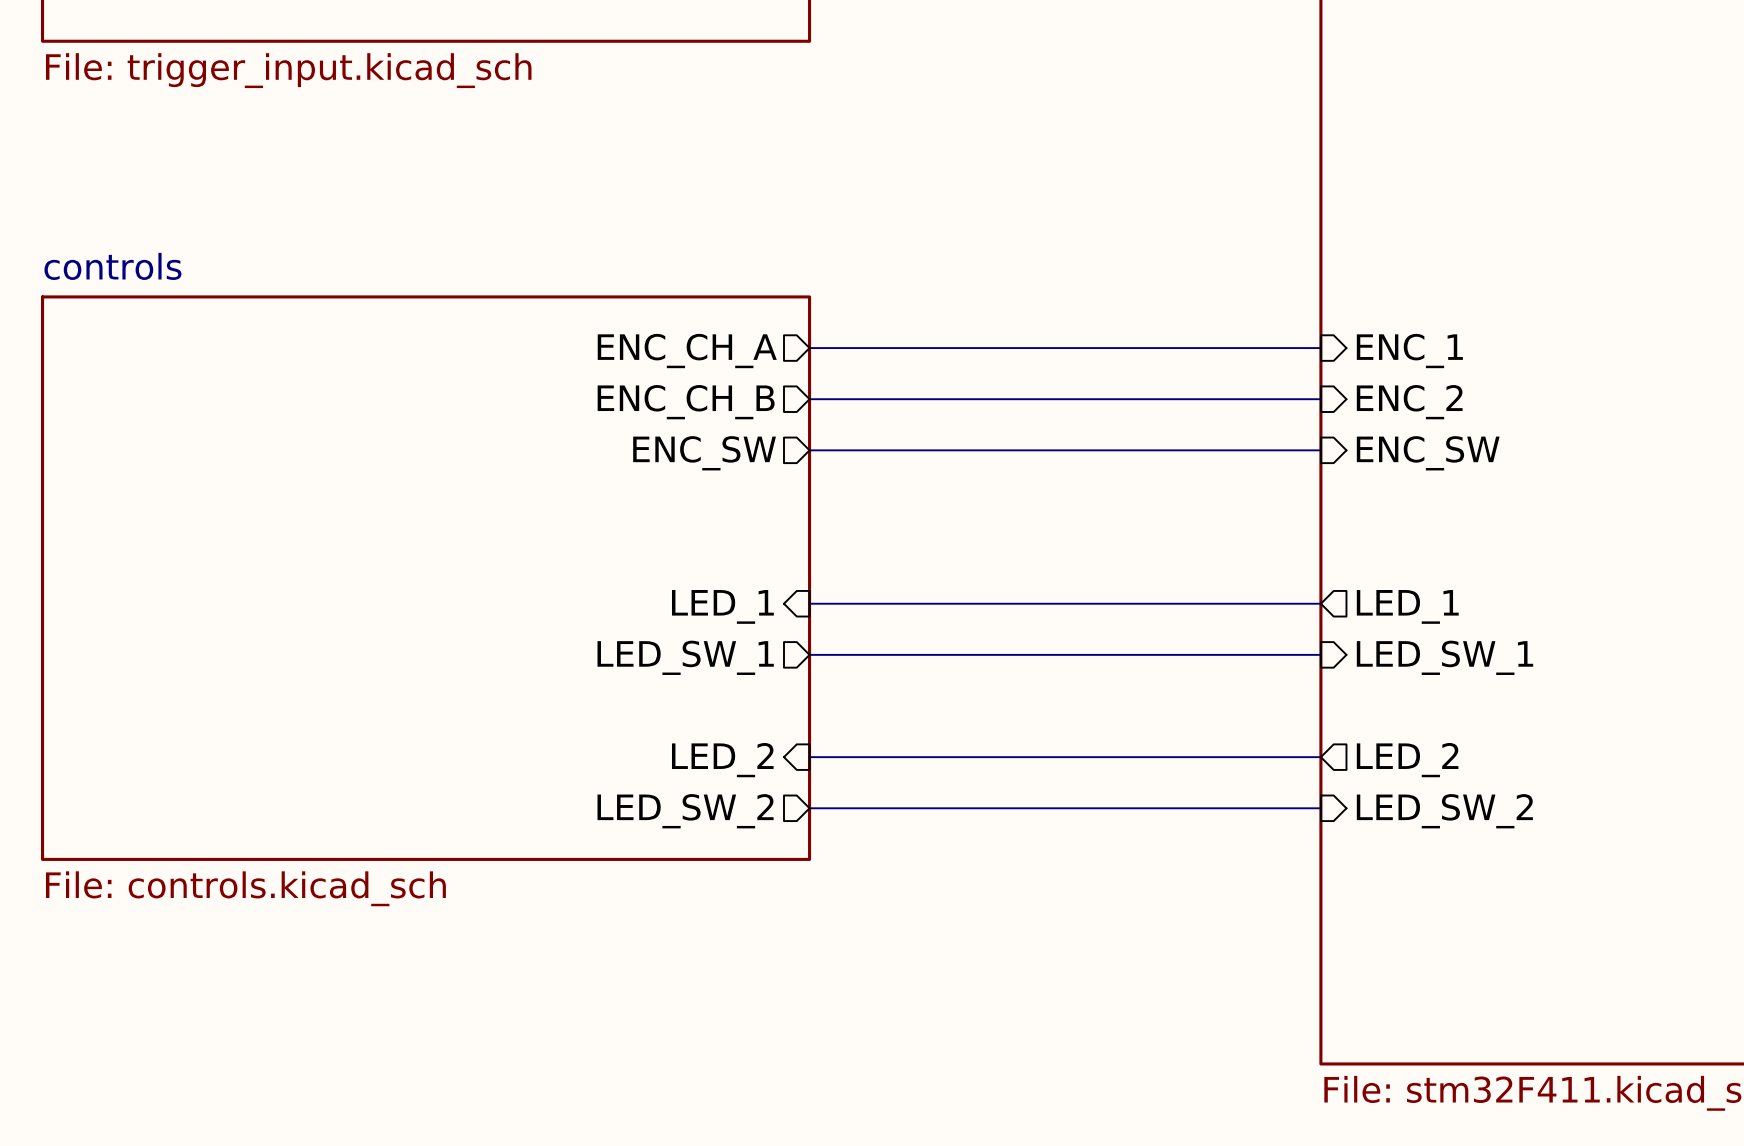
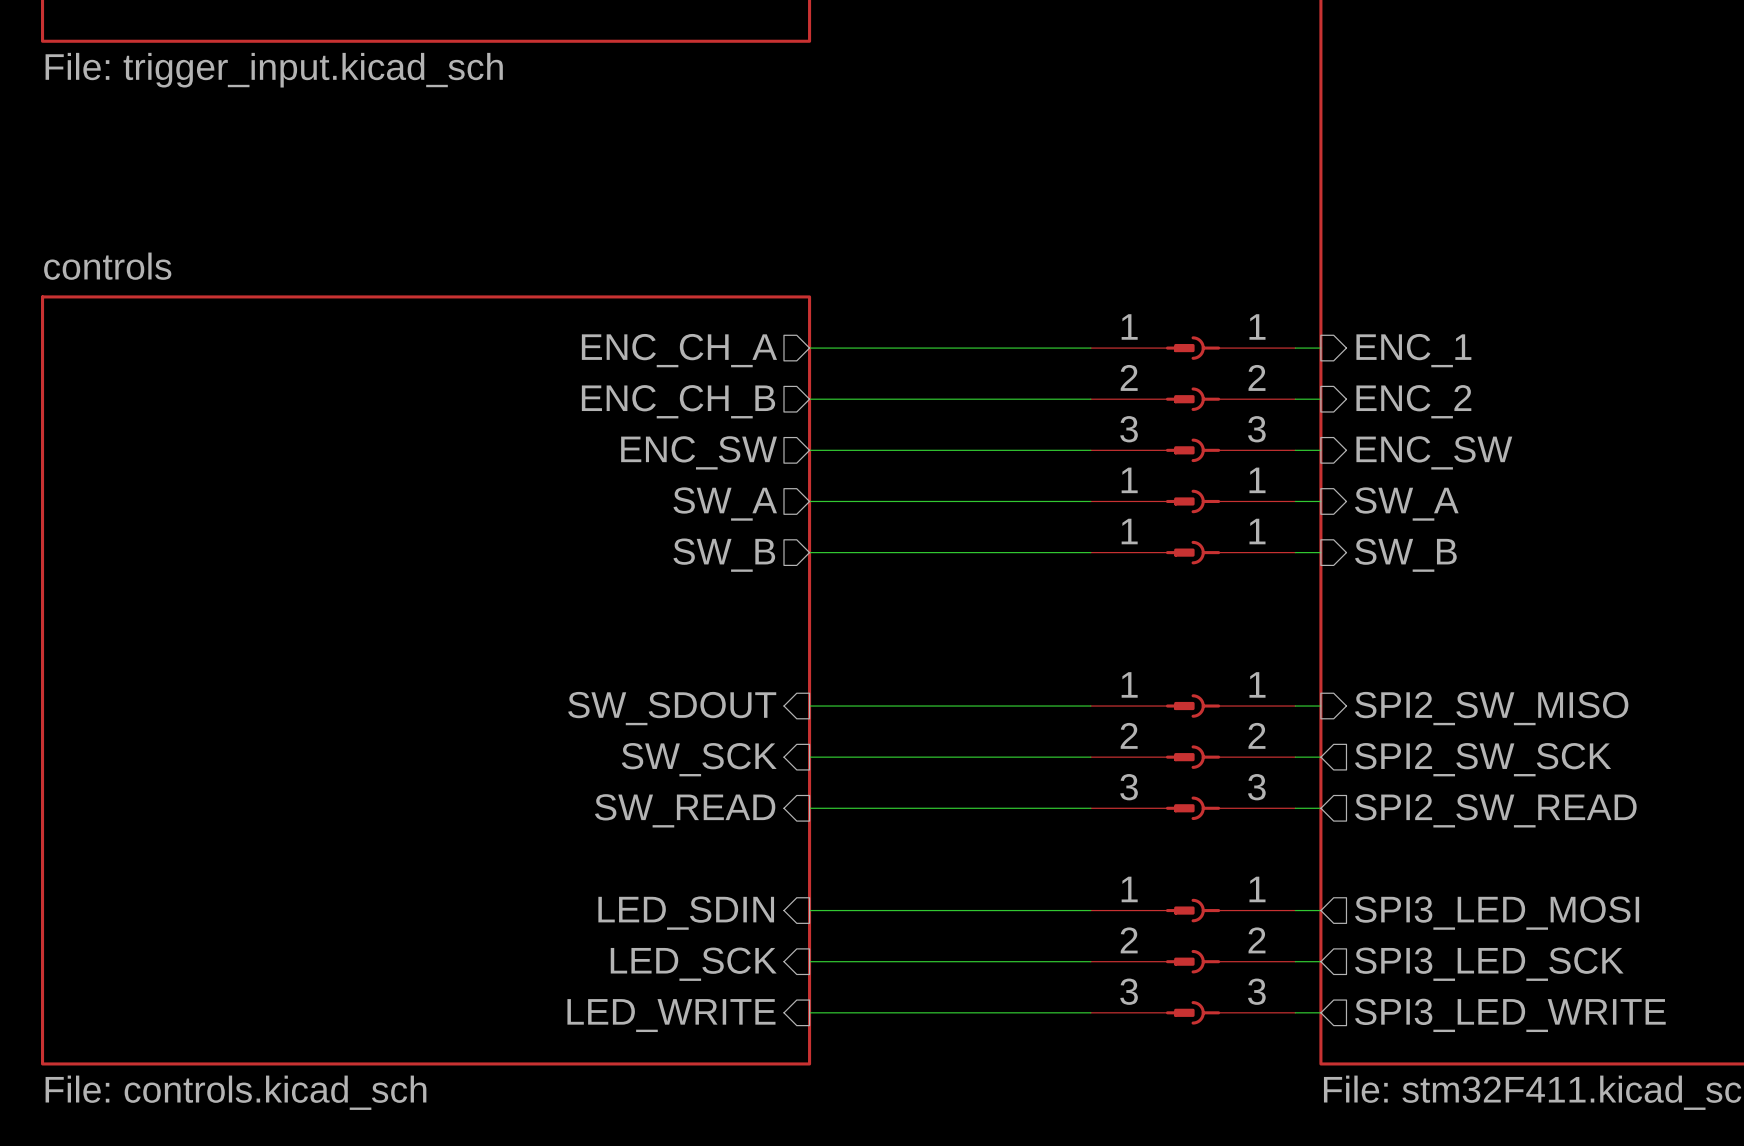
part: none -> (1142, 348)
part: none -> (1243, 348)
part: none -> (1142, 399)
part: none -> (1243, 399)
part: none -> (1142, 450)
part: none -> (1243, 450)
wire: none -> (809, 501) (1090, 501)
part: none -> (1142, 501)
part: none -> (1243, 501)
wire: none -> (1295, 501) (1320, 501)
sheet pin: none -> SW_A (725, 504)
sheet pin: none -> SW_A (1406, 504)
wire: none -> (809, 552) (1090, 552)
part: none -> (1142, 552)
part: none -> (1243, 552)
wire: none -> (1295, 552) (1320, 552)
sheet pin: none -> SW_B (724, 555)
sheet pin: none -> SW_B (1405, 555)
sheet controls: File: controls.kicad_sch (426, 578) -> none
wire: (809, 603) (1320, 603) -> none
sheet pin: LED_1 (722, 606) -> none
sheet pin: LED_1 (1407, 606) -> none
wire: (809, 654) (1320, 654) -> none
sheet pin: LED_SW_1 (685, 657) -> none
sheet pin: LED_SW_1 (1444, 657) -> none
sheet controls: none -> File: controls.kicad_sch (426, 680)
wire: none -> (809, 706) (1090, 706)
part: none -> (1142, 706)
part: none -> (1243, 706)
wire: none -> (1295, 706) (1320, 706)
sheet pin: none -> SW_SDOUT (672, 708)
sheet pin: none -> SPI2_SW_MISO (1491, 708)
part: none -> (1142, 757)
part: none -> (1243, 757)
sheet pin: LED_2 (722, 760) -> SW_SCK (699, 759)
sheet pin: LED_2 (1407, 760) -> SPI2_SW_SCK (1483, 759)
part: none -> (1142, 808)
part: none -> (1243, 808)
sheet pin shape: output (685, 811) -> input (685, 810)
sheet pin: LED_SW_2 (685, 811) -> SW_READ (685, 810)
sheet pin shape: input (1444, 811) -> output (1495, 810)
sheet pin: LED_SW_2 (1444, 811) -> SPI2_SW_READ (1495, 810)
wire: none -> (809, 910) (1090, 910)
part: none -> (1142, 910)
part: none -> (1243, 910)
wire: none -> (1295, 910) (1320, 910)
sheet pin: none -> LED_SDIN (686, 913)
sheet pin: none -> SPI3_LED_MOSI (1497, 913)
wire: none -> (809, 961) (1090, 961)
part: none -> (1142, 961)
part: none -> (1243, 961)
wire: none -> (1295, 961) (1320, 961)
sheet pin: none -> LED_SCK (693, 964)
sheet pin: none -> SPI3_LED_SCK (1489, 964)
wire: none -> (809, 1012) (1090, 1012)
part: none -> (1142, 1012)
part: none -> (1243, 1012)
wire: none -> (1295, 1012) (1320, 1012)
sheet pin: none -> SPI3_LED_WRITE (1510, 1015)
sheet pin: none -> LED_WRITE (671, 1015)

